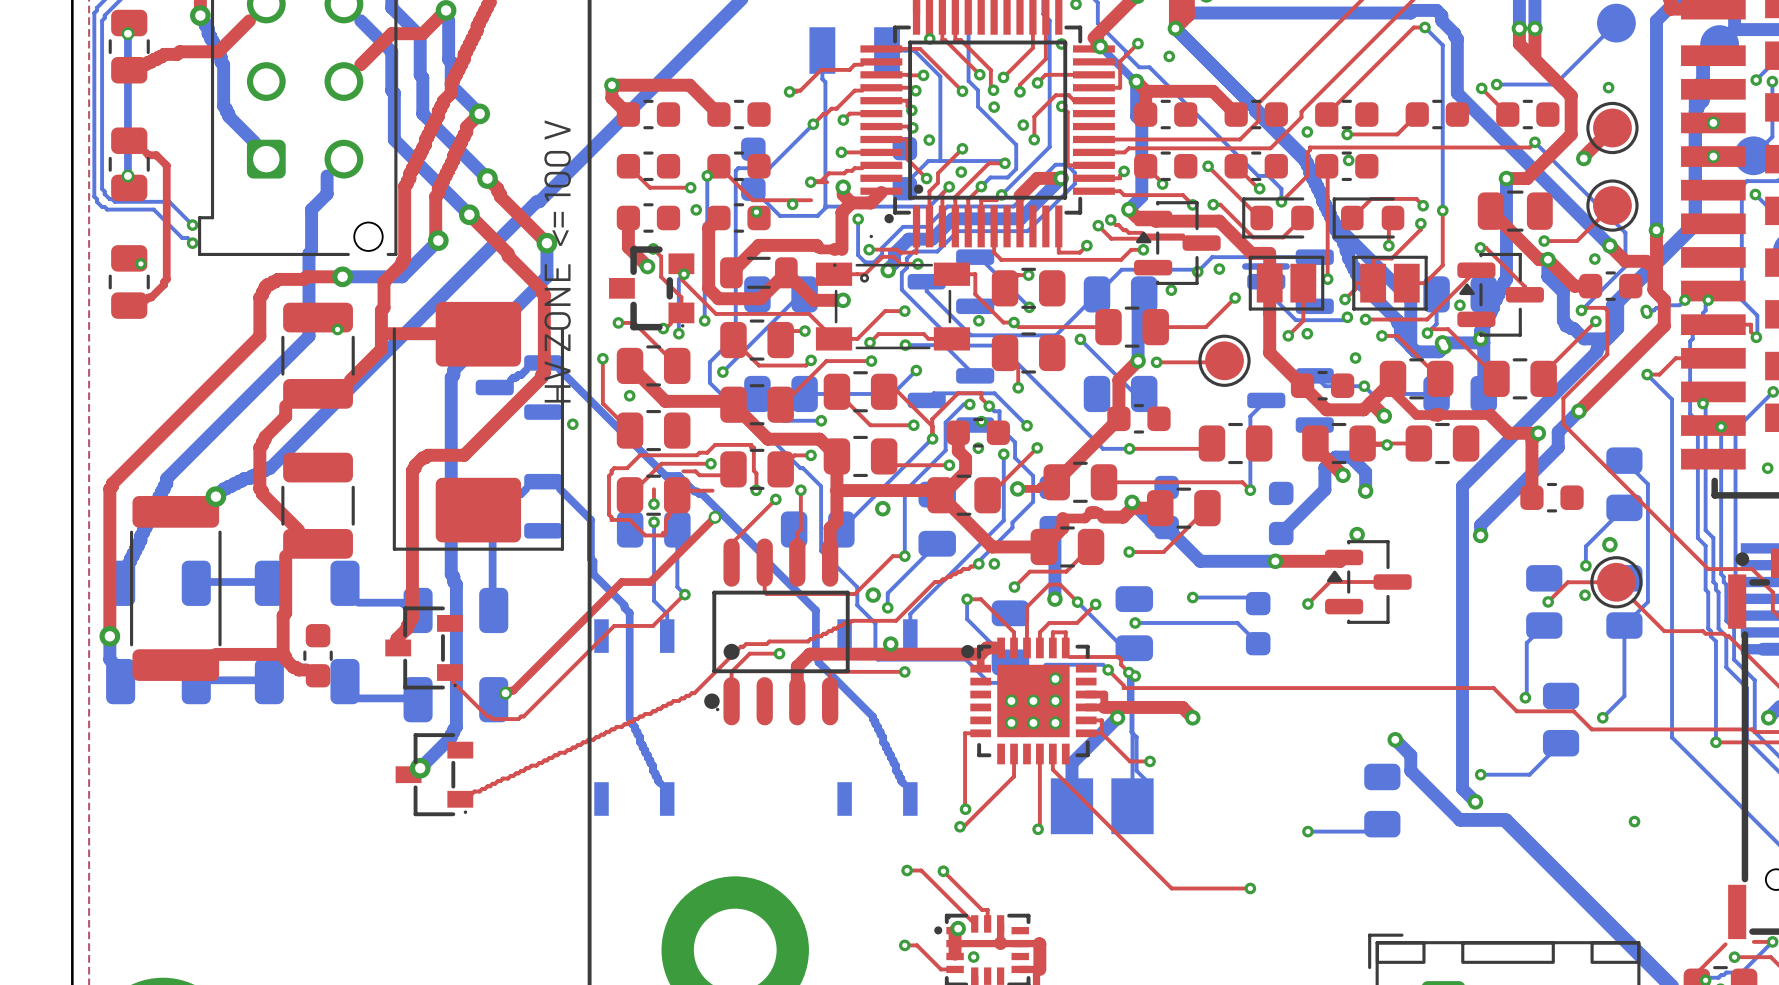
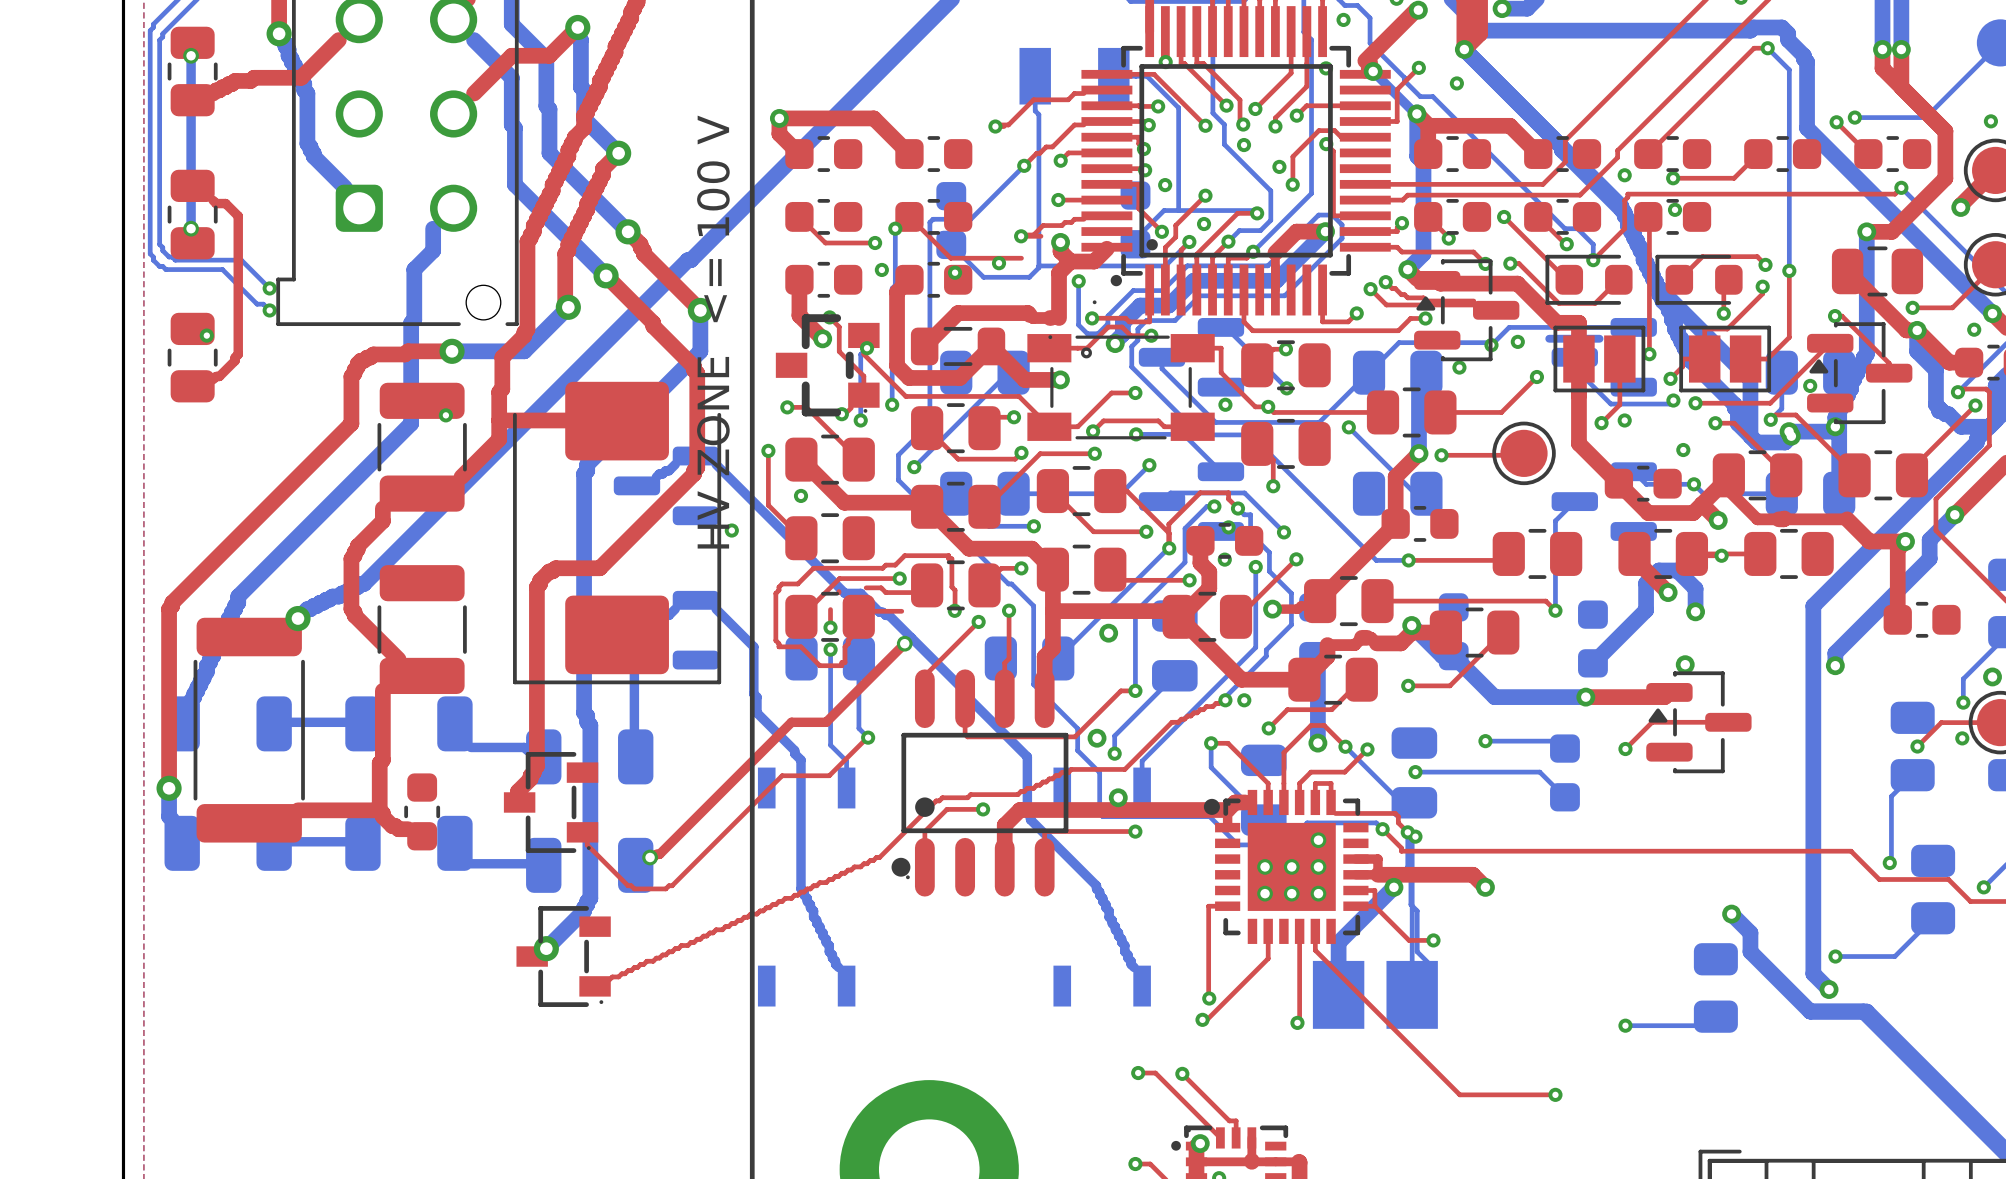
top track: none -> (839, 591) (839, 592)

